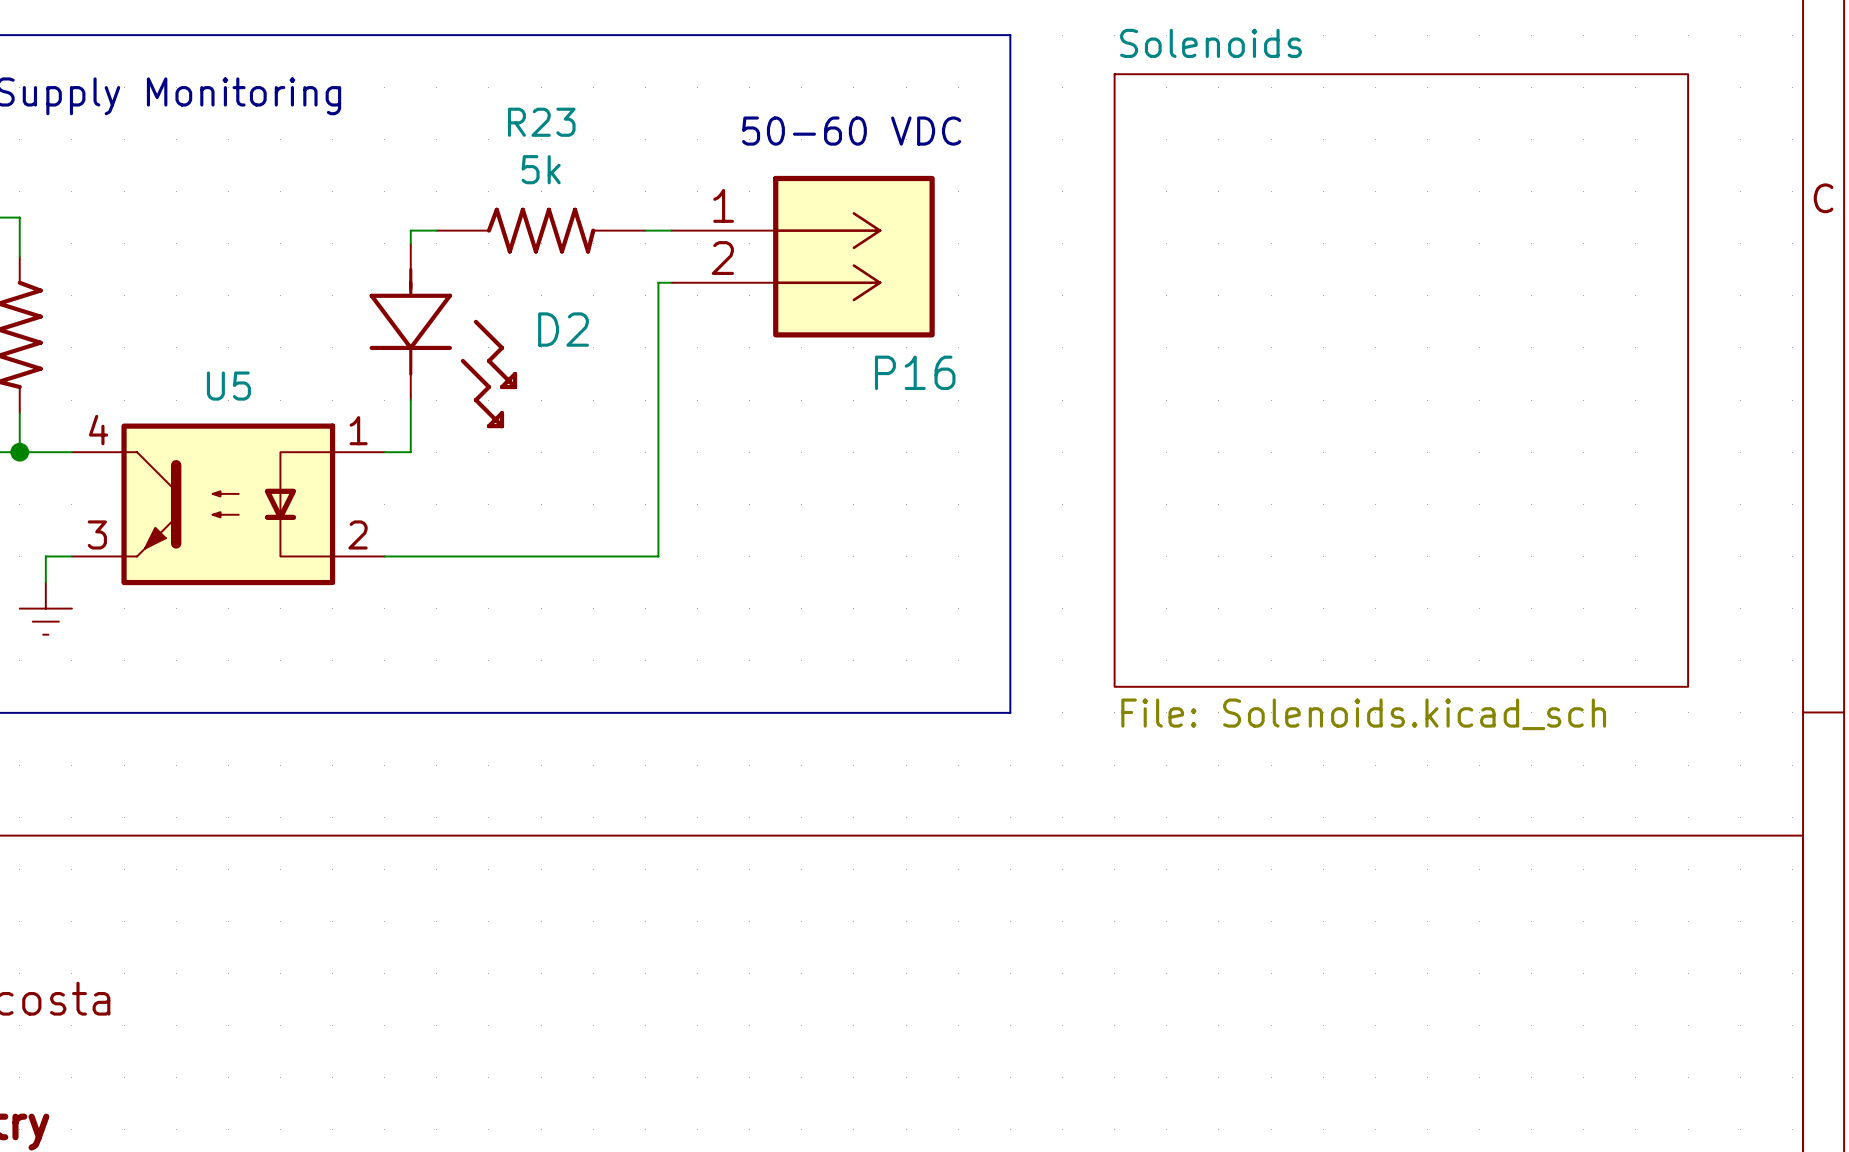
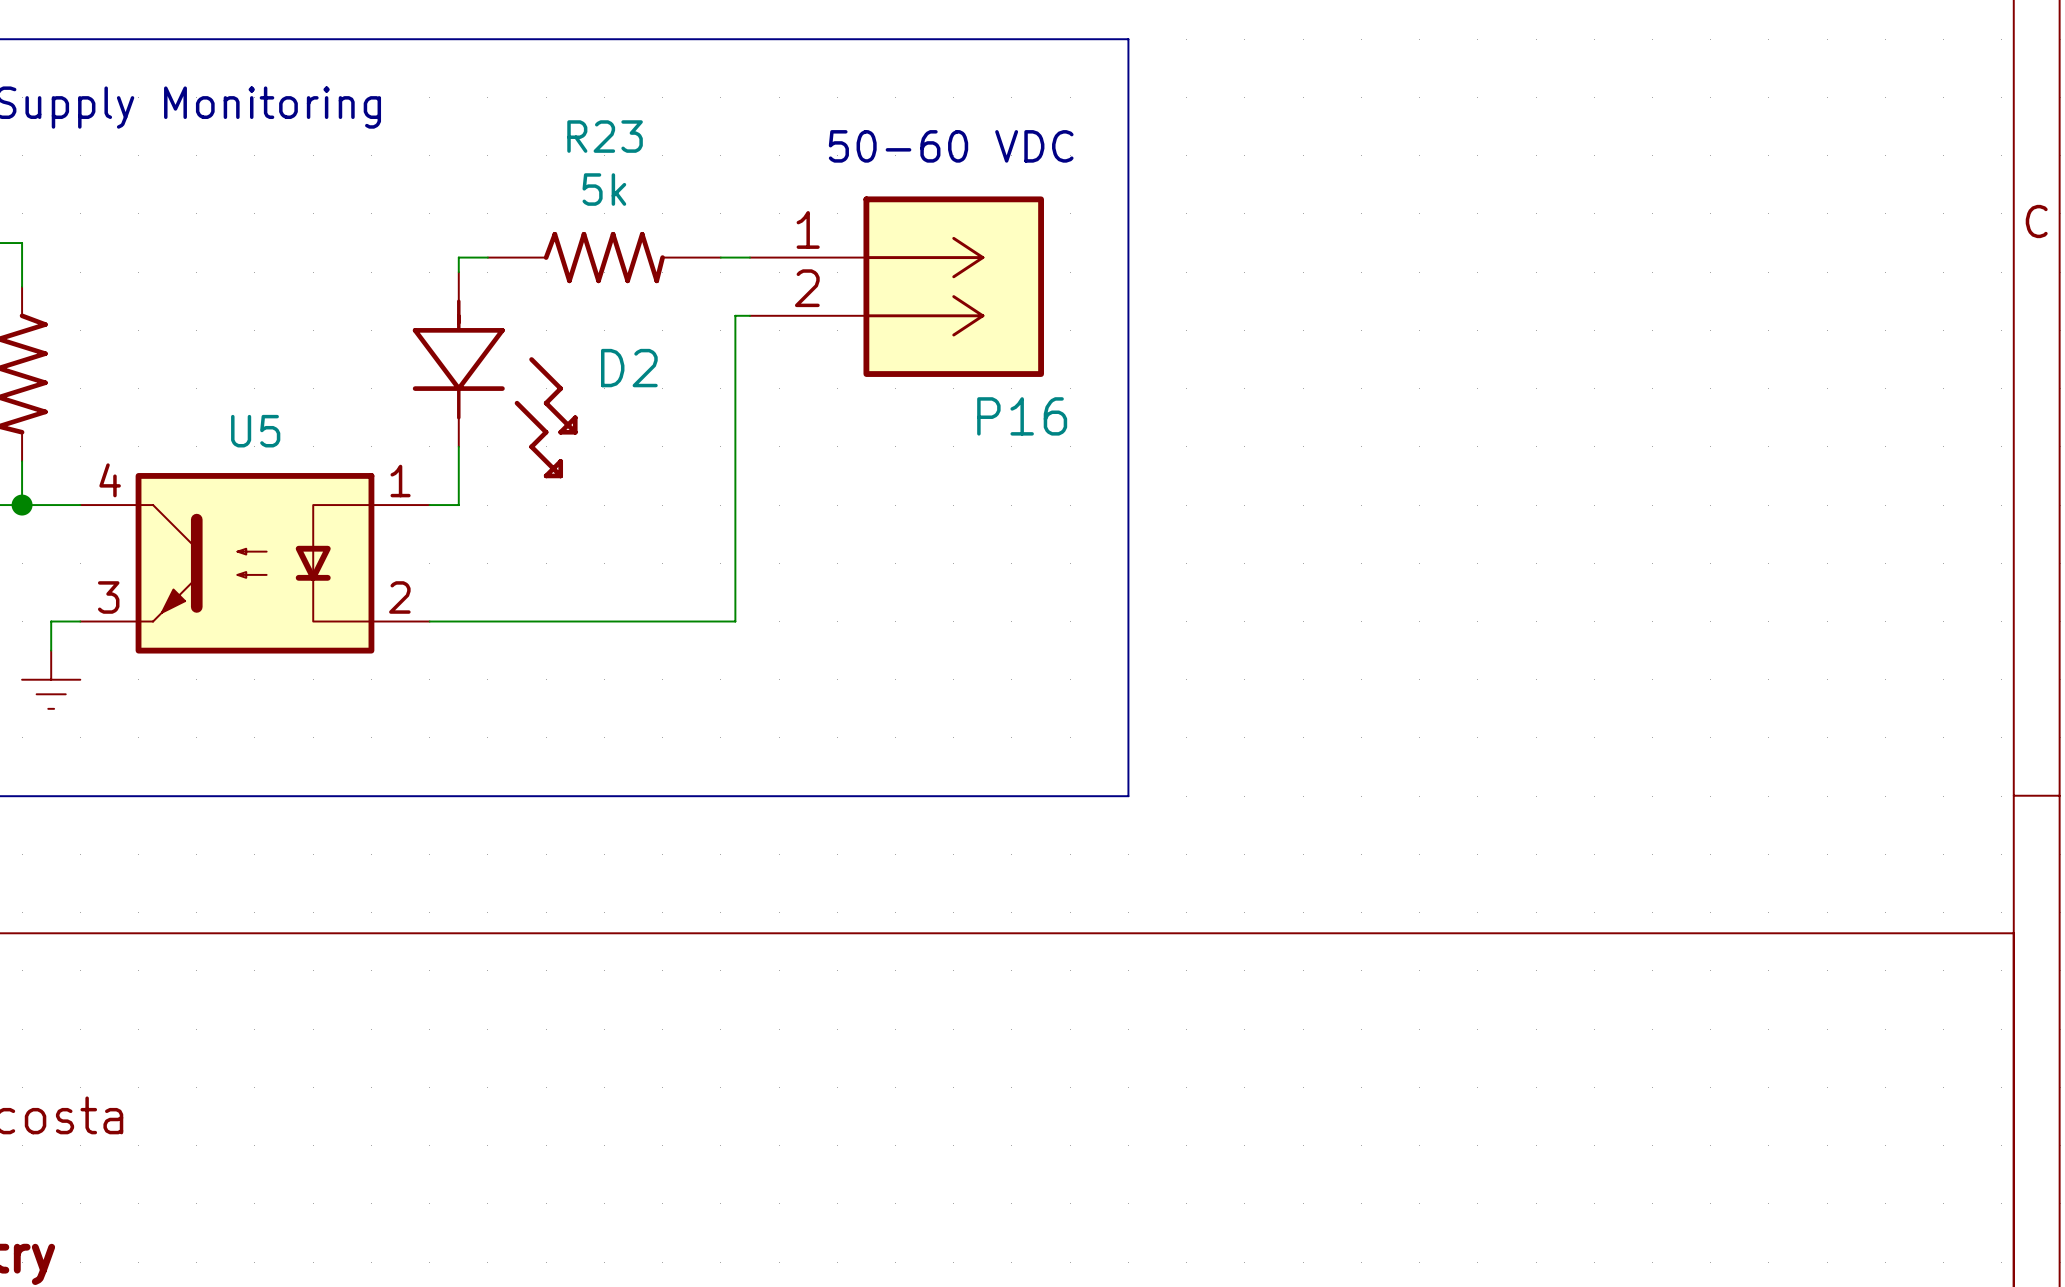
sheet Solenoids: File: Solenoids.kicad_sch (1401, 380) -> none

